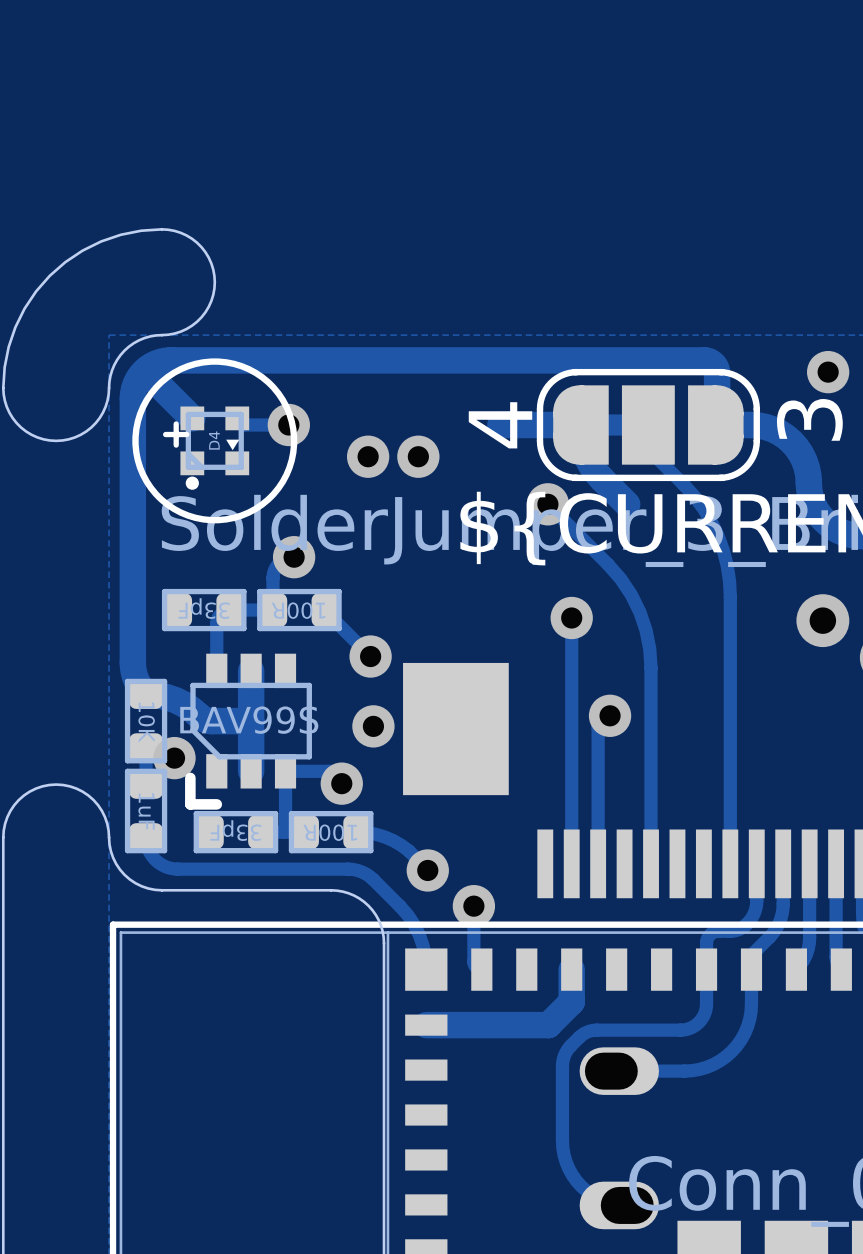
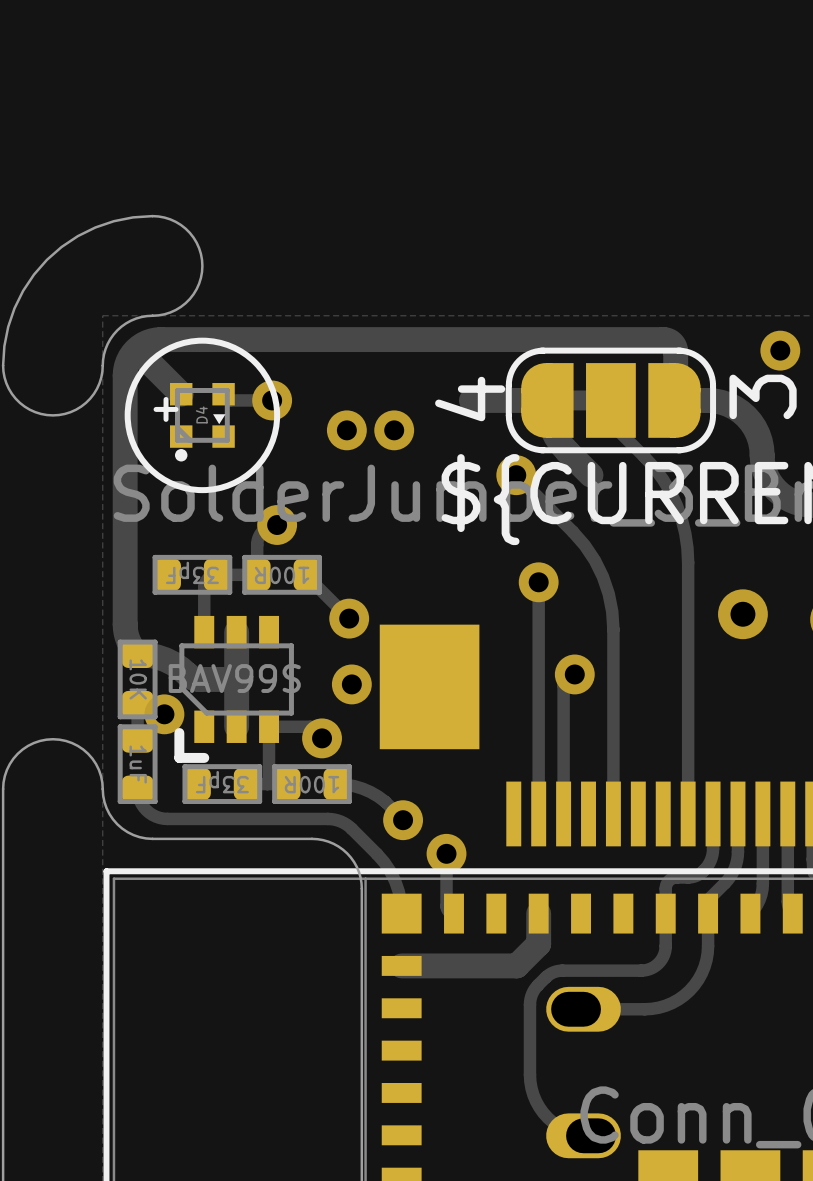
via position: (822, 620) -> (742, 614)

